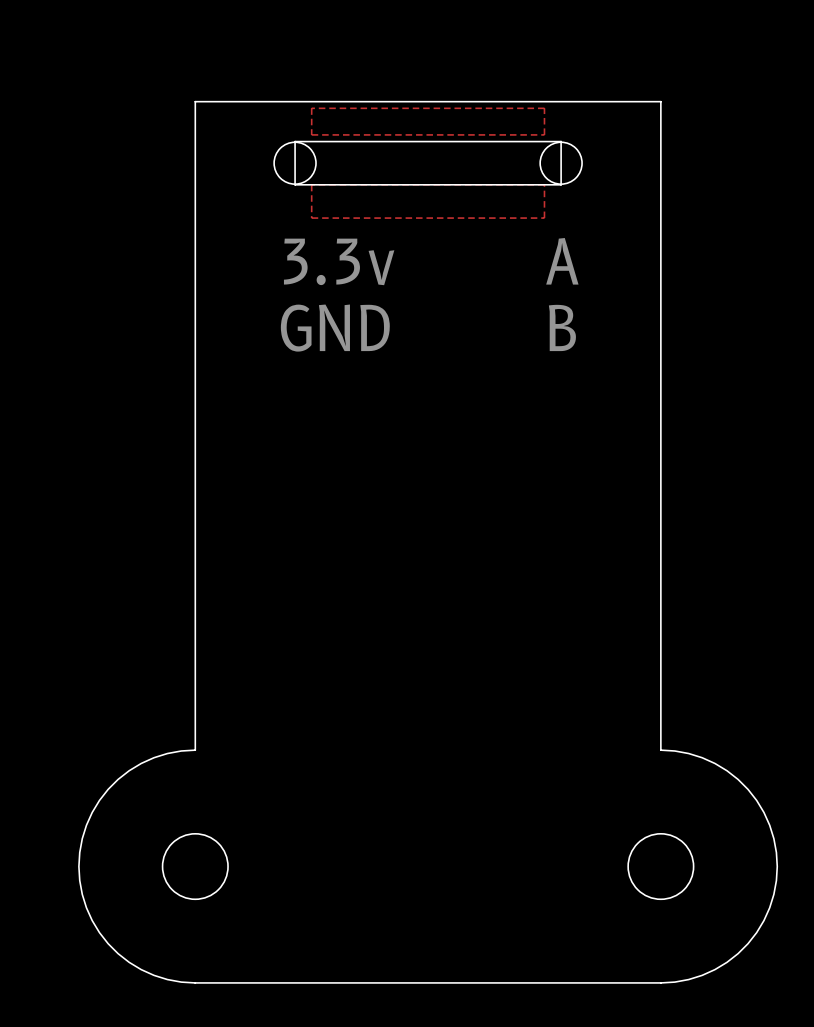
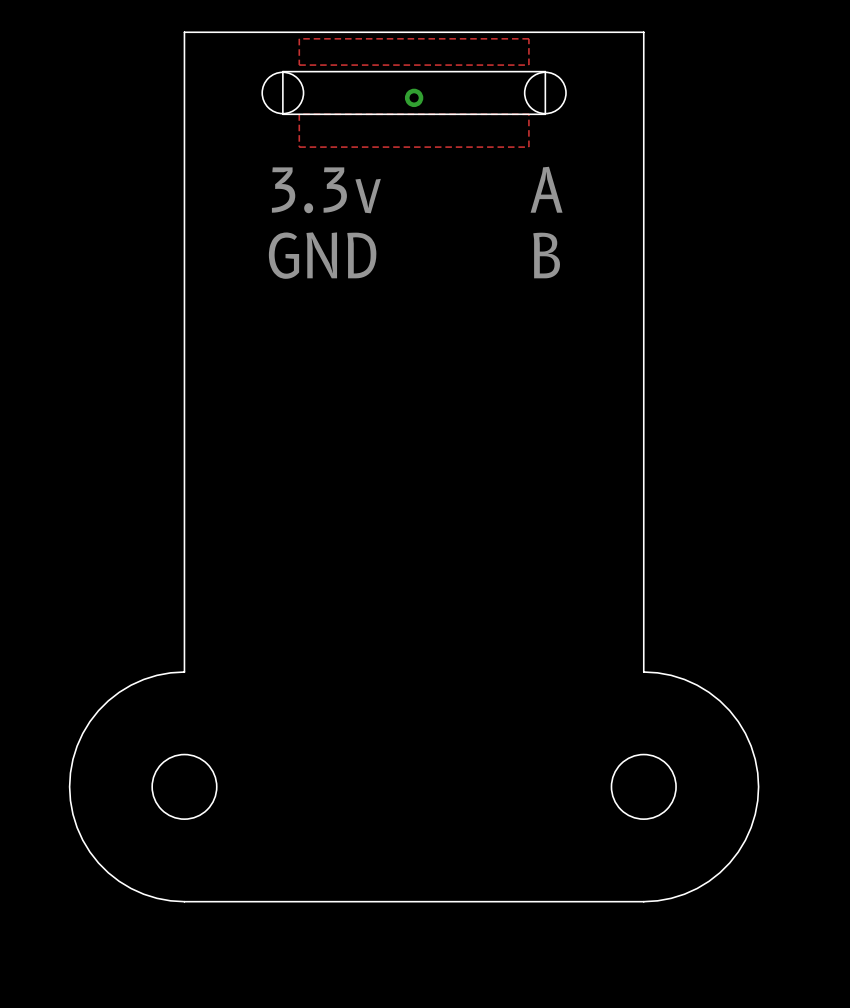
via: none -> (414, 97)

